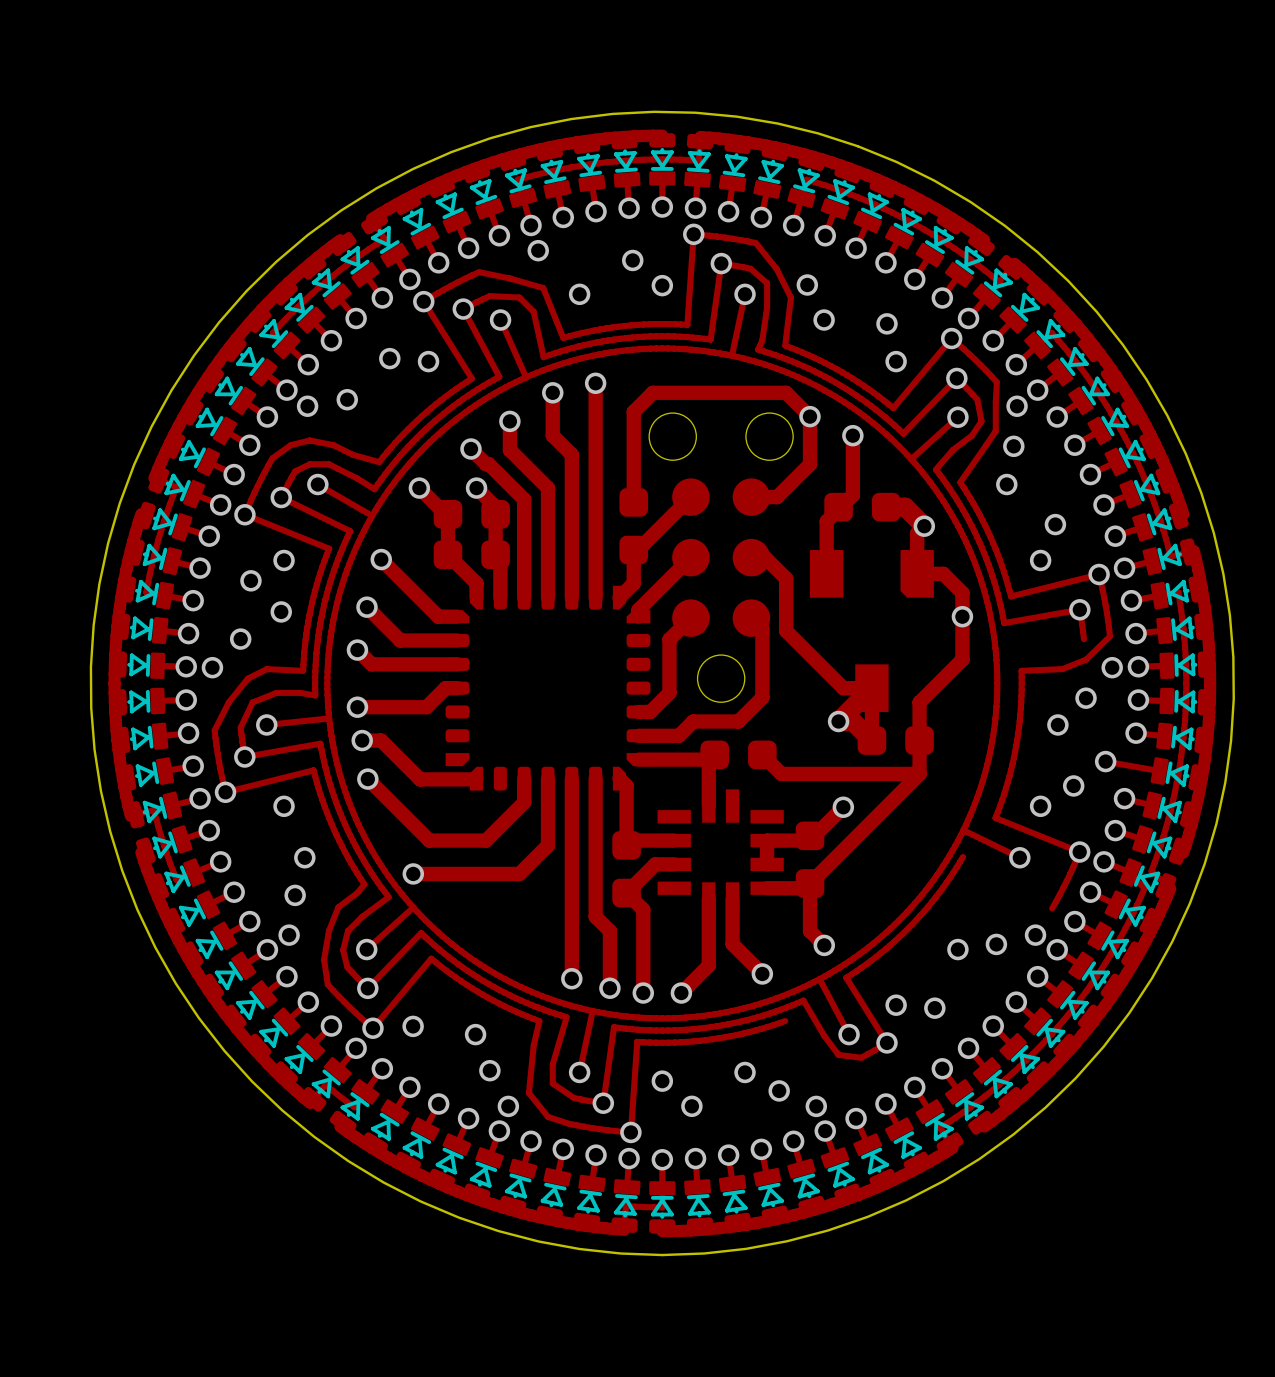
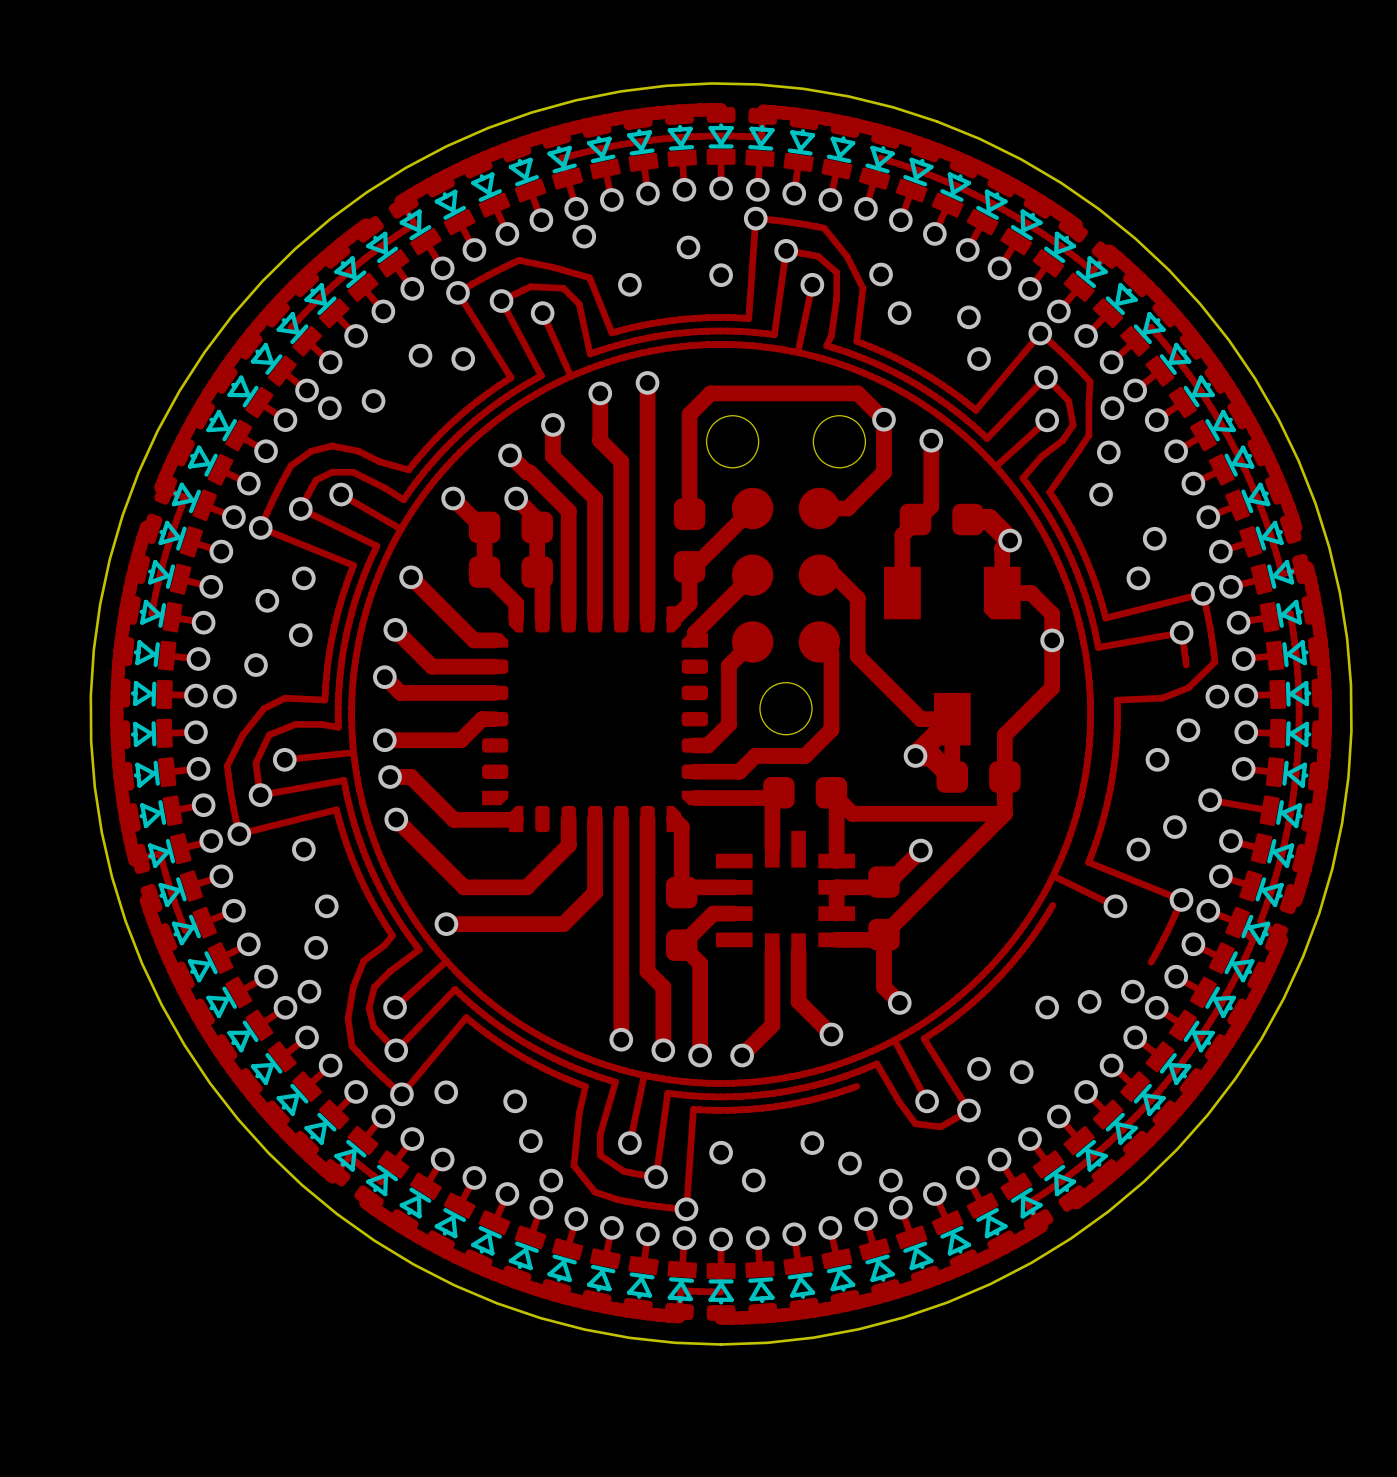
track: none -> (836, 798) (836, 861)

